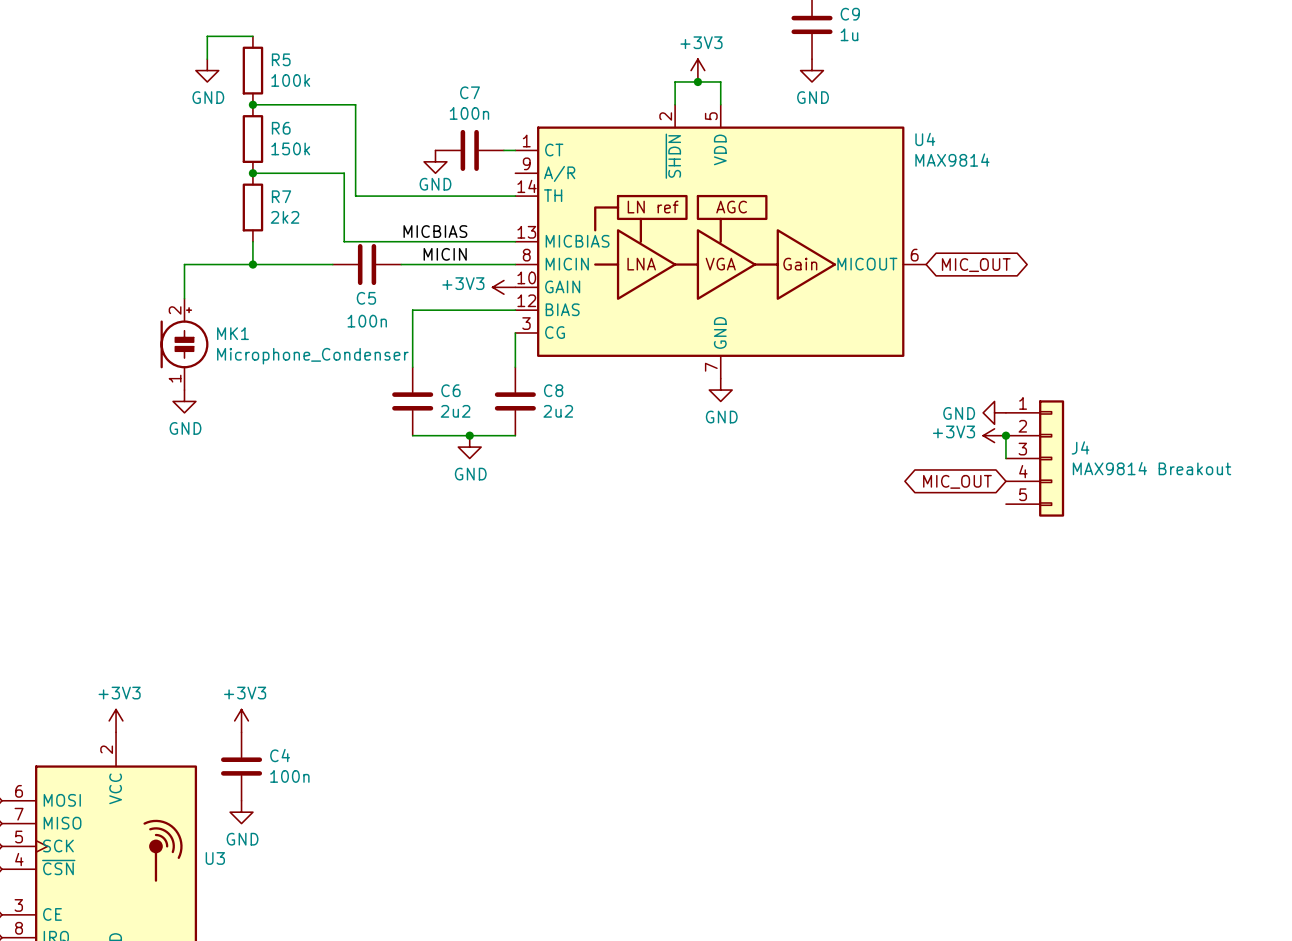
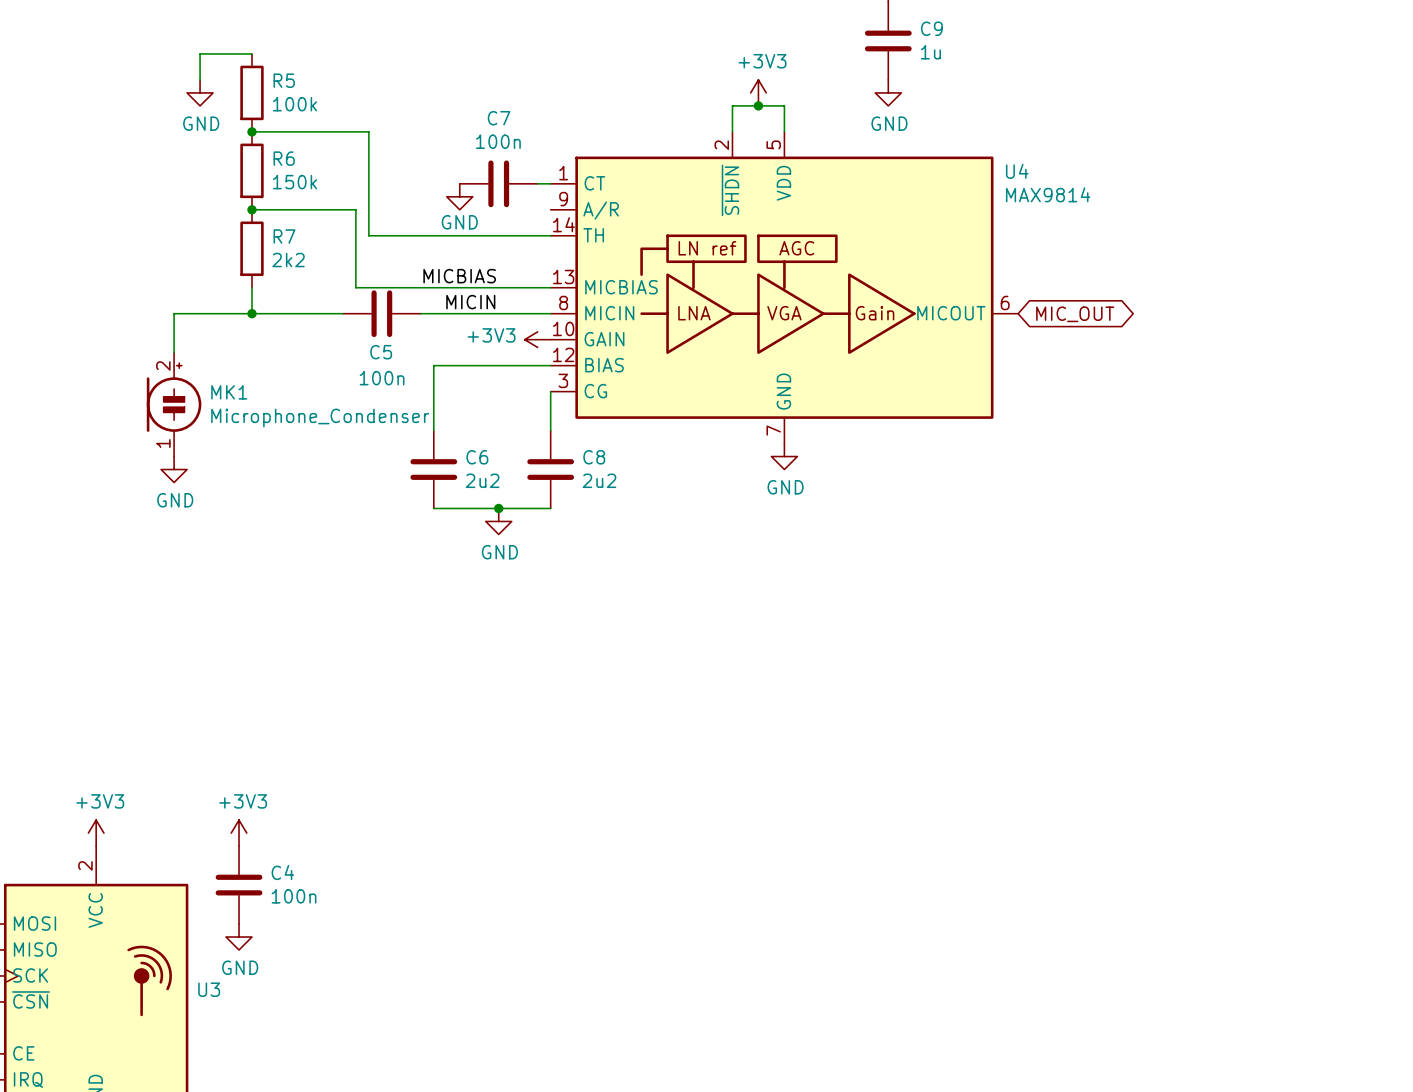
power symbol: GND (994, 412) -> none
power symbol: +3V3 (994, 435) -> none
wire: (1005, 435) (1005, 458) -> none
junction: (1005, 435) -> none
J4: MAX9814 Breakout (1035, 458) -> none
global label: MIC_OUT (957, 481) -> none

